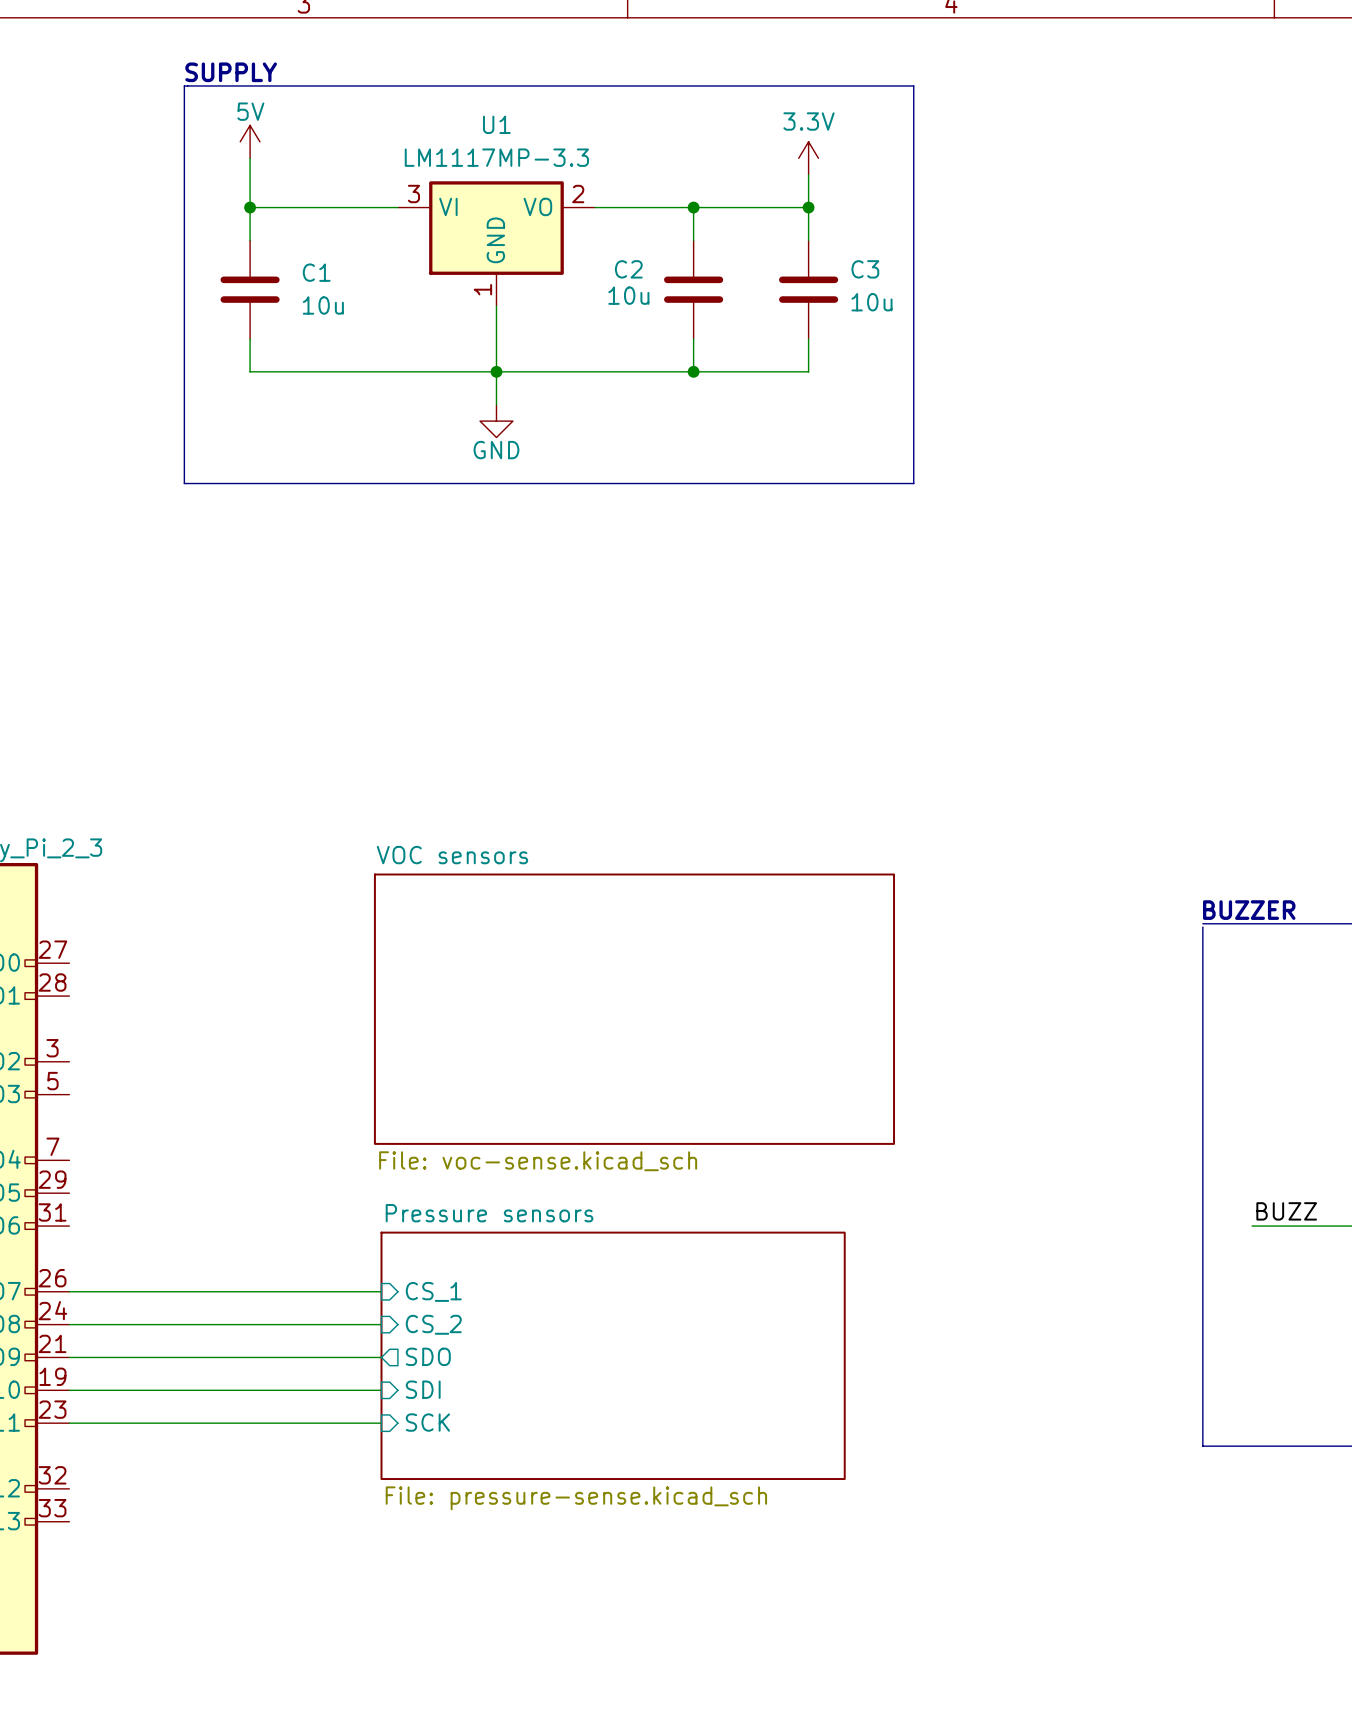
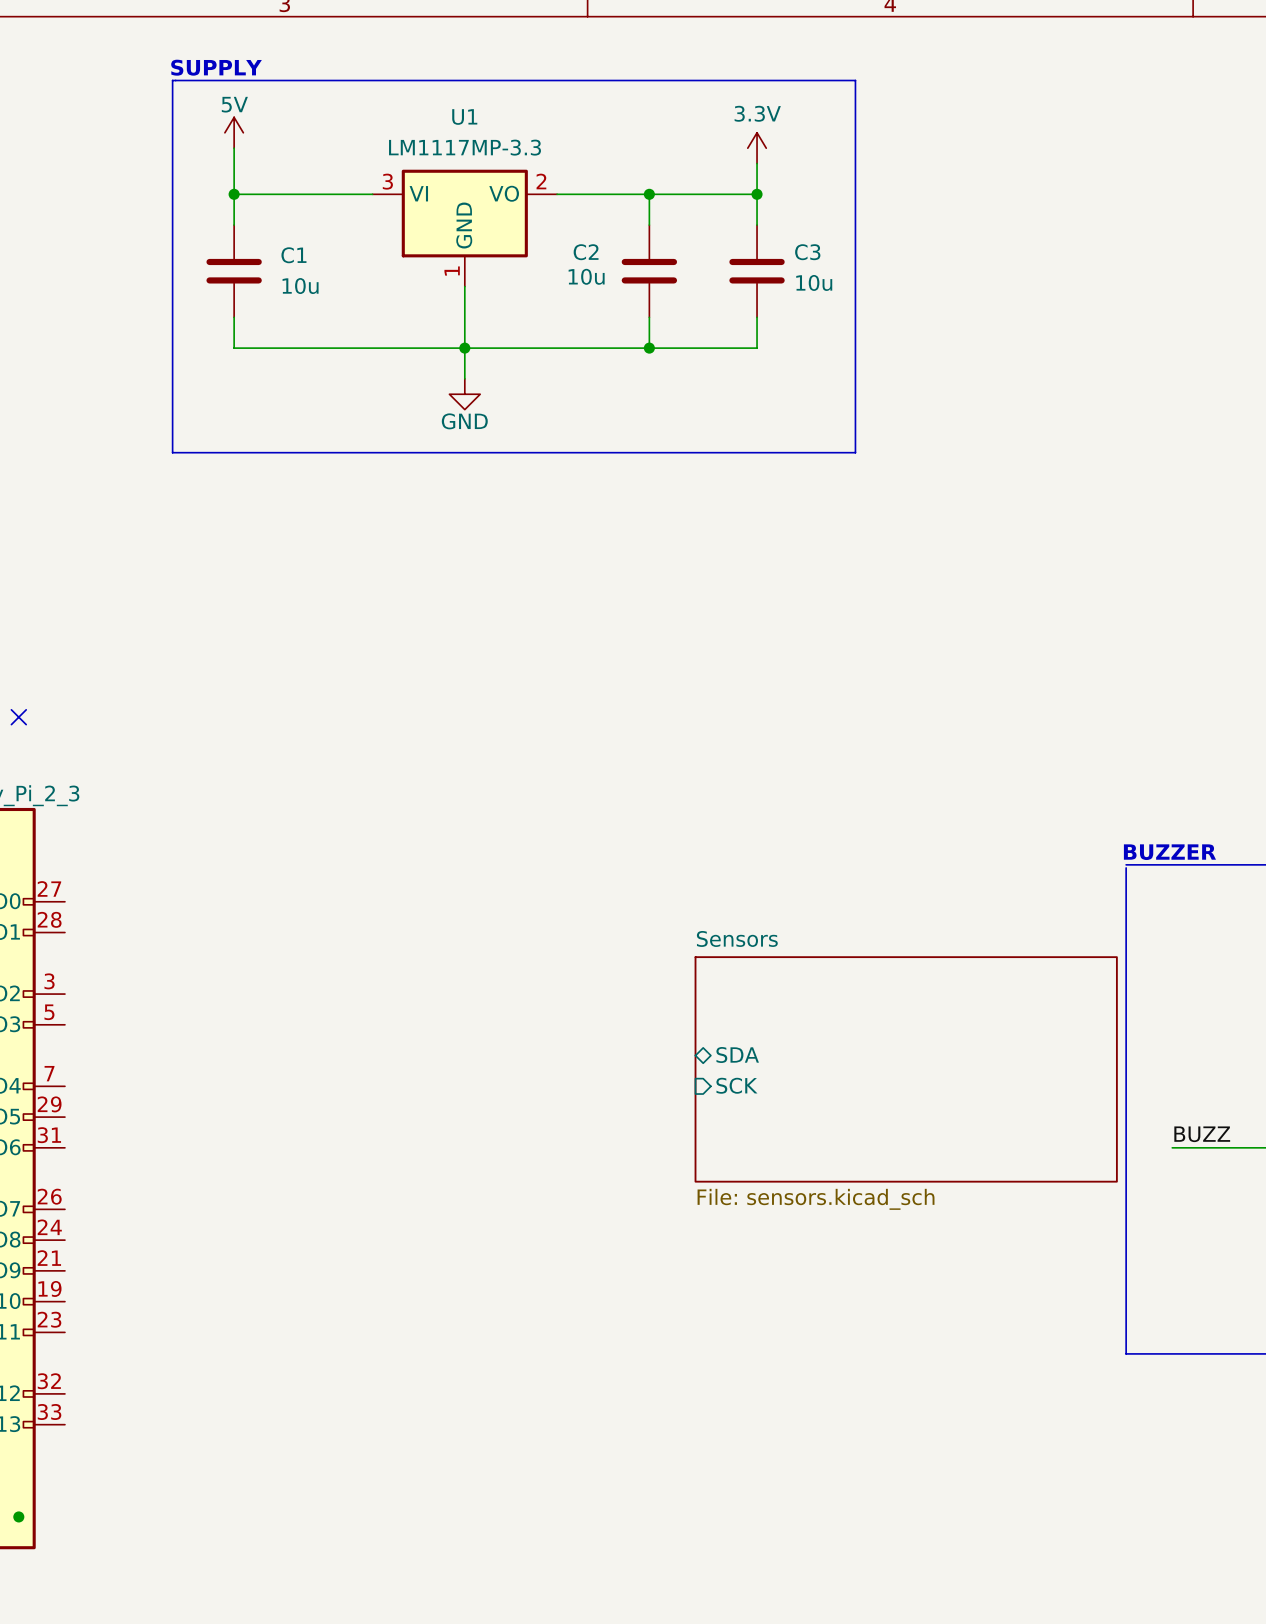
no-connect mark: none -> (18, 717)
sheet VOC sensors: File: voc-sense.kicad_sch (634, 1009) -> none
sheet pin: none -> SDA (737, 1055)
sheet Sensors: none -> File: sensors.kicad_sch (906, 1069)
sheet pin: none -> SCK (736, 1085)
wire: (69, 1291) (381, 1291) -> none
sheet pin: CS_1 (433, 1291) -> none
wire: (69, 1324) (381, 1324) -> none
sheet pin: CS_2 (433, 1324) -> none
sheet Pressure sensors: File: pressure-sense.kicad_sch (613, 1355) -> none
sheet pin: SDO (428, 1356) -> none
wire: (69, 1357) (381, 1357) -> none
sheet pin: SDI (423, 1389) -> none
wire: (69, 1390) (381, 1390) -> none
sheet pin: SCK (427, 1422) -> none
wire: (69, 1423) (381, 1423) -> none
junction: none -> (18, 1516)

